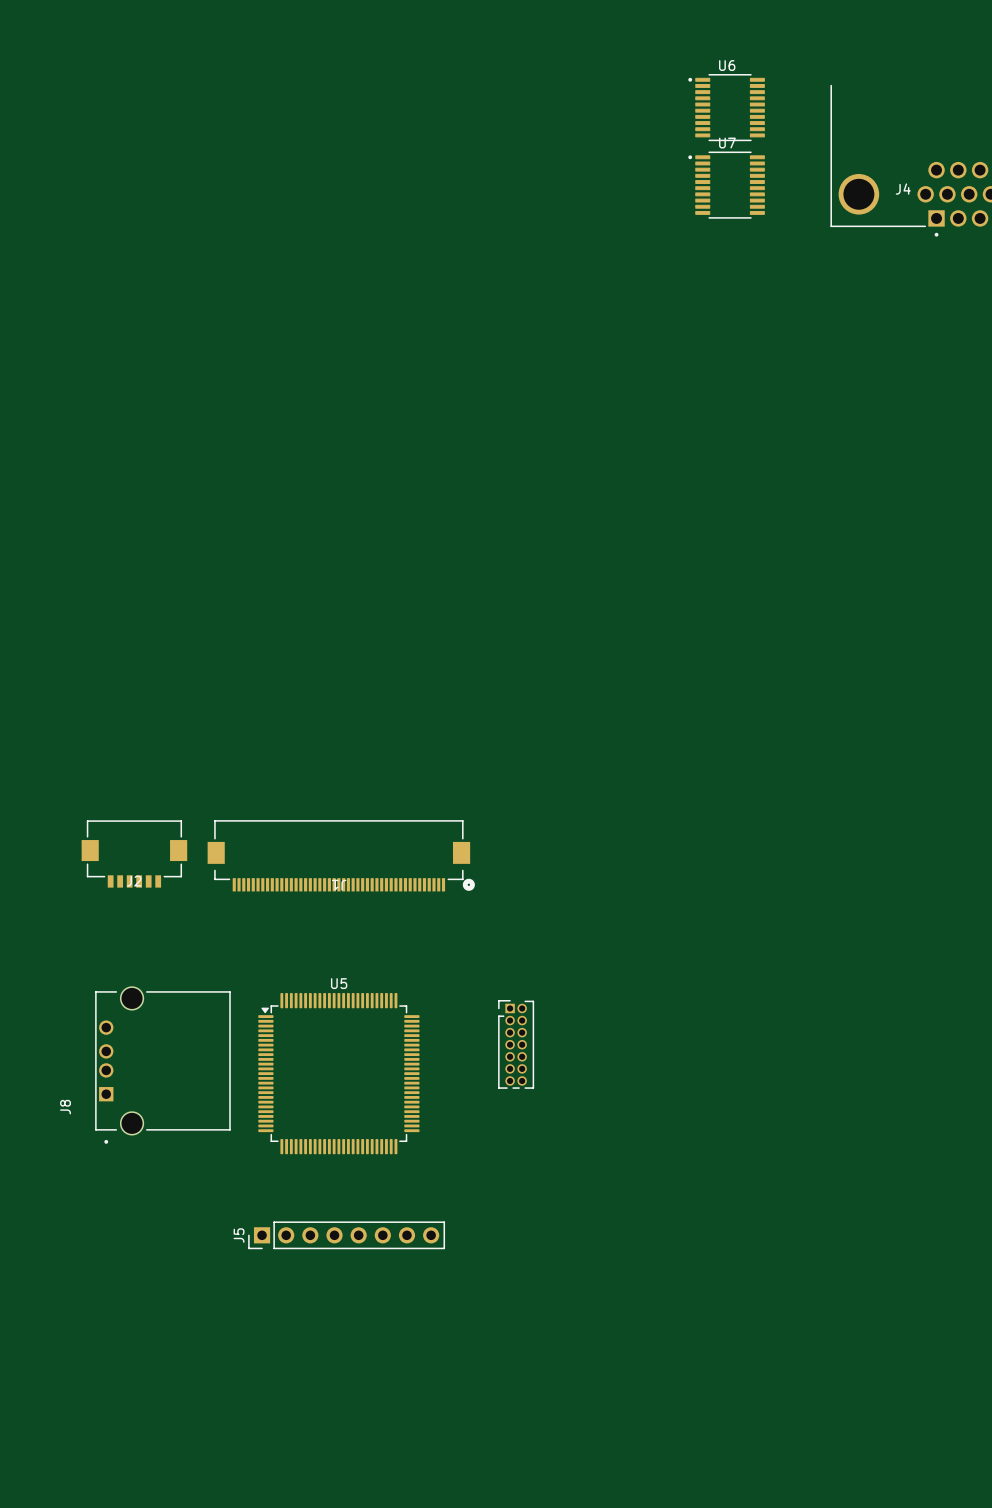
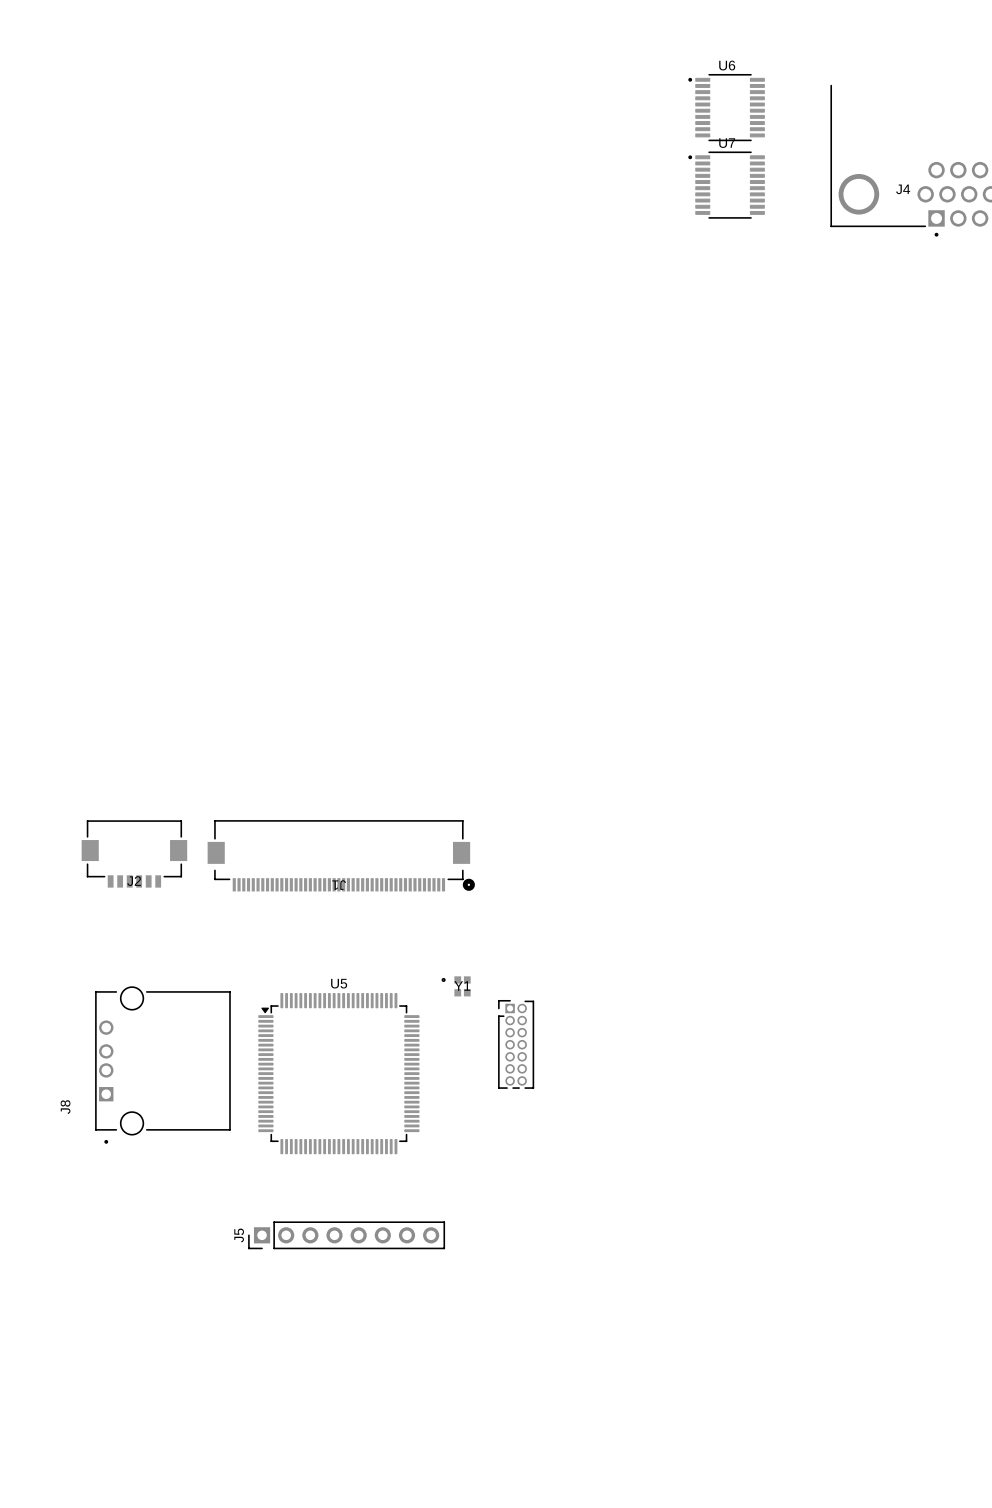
Y1: none -> (456, 986)

